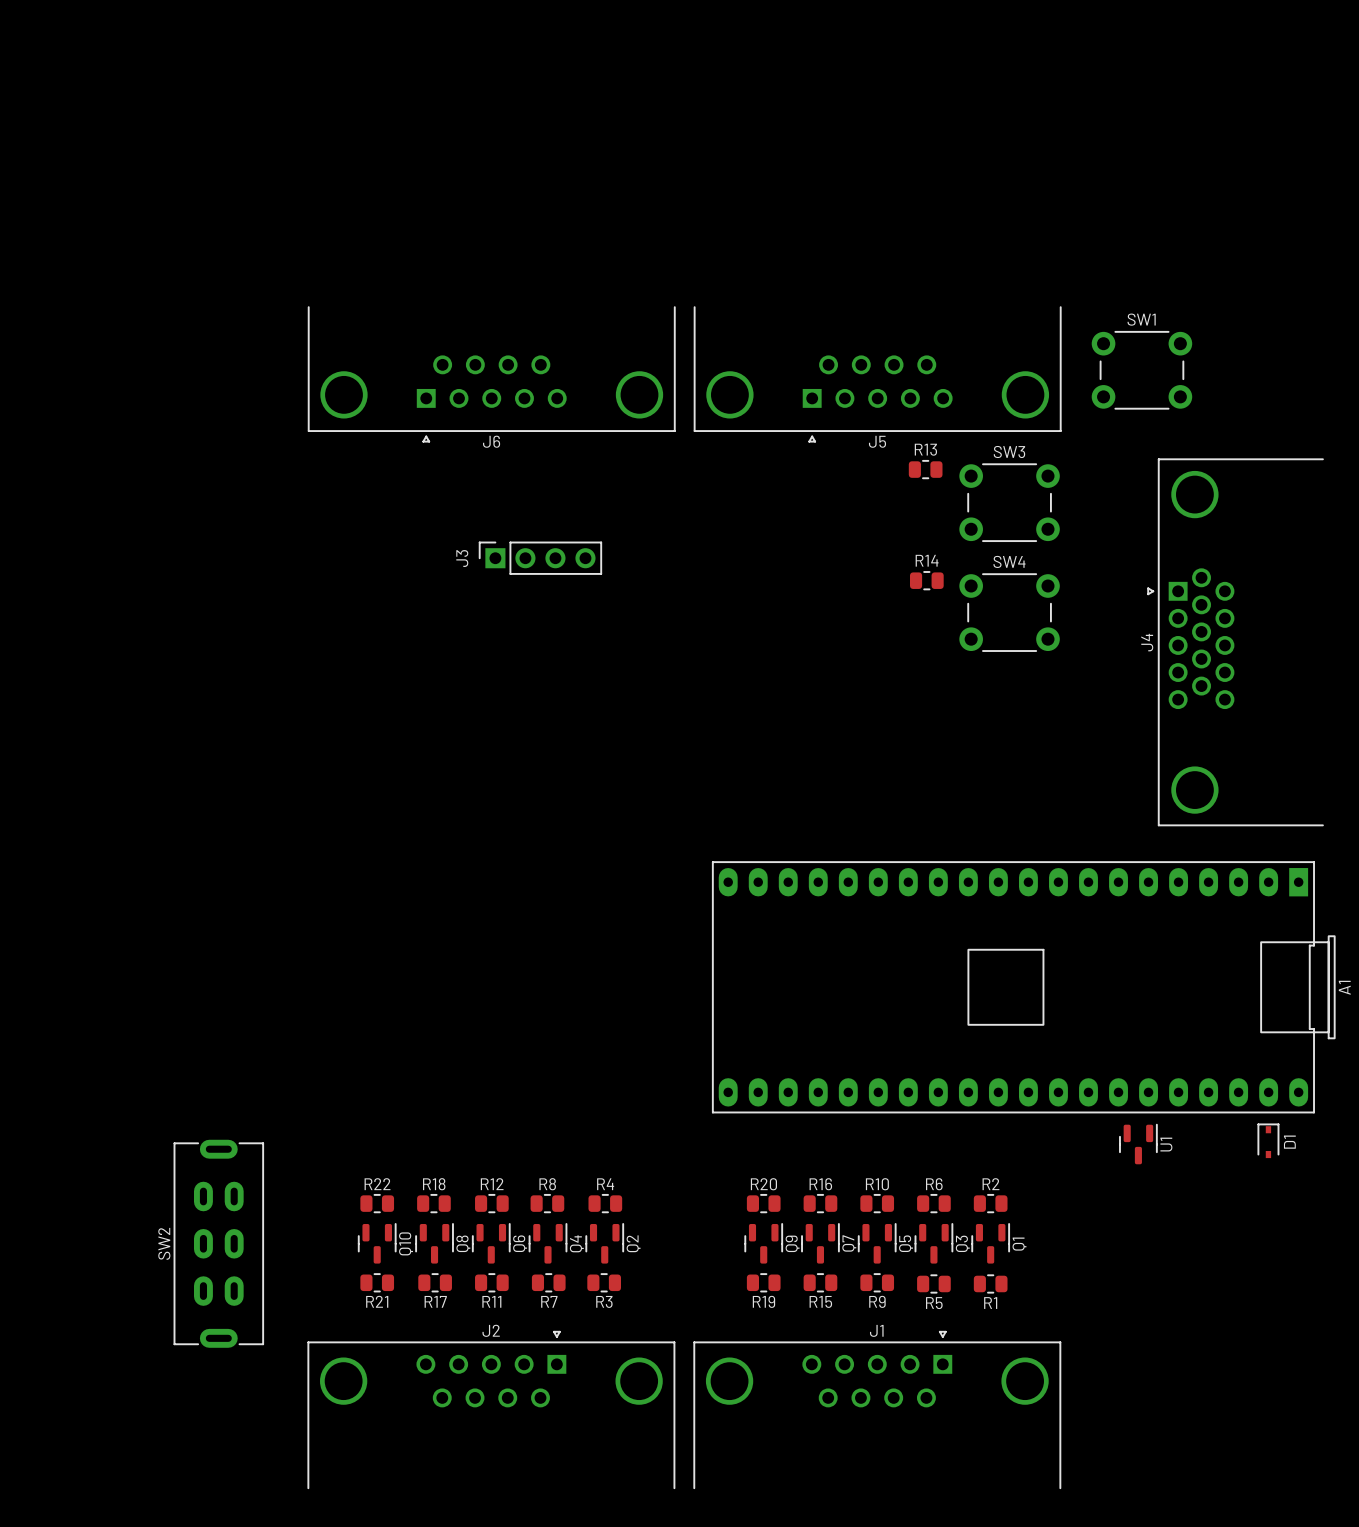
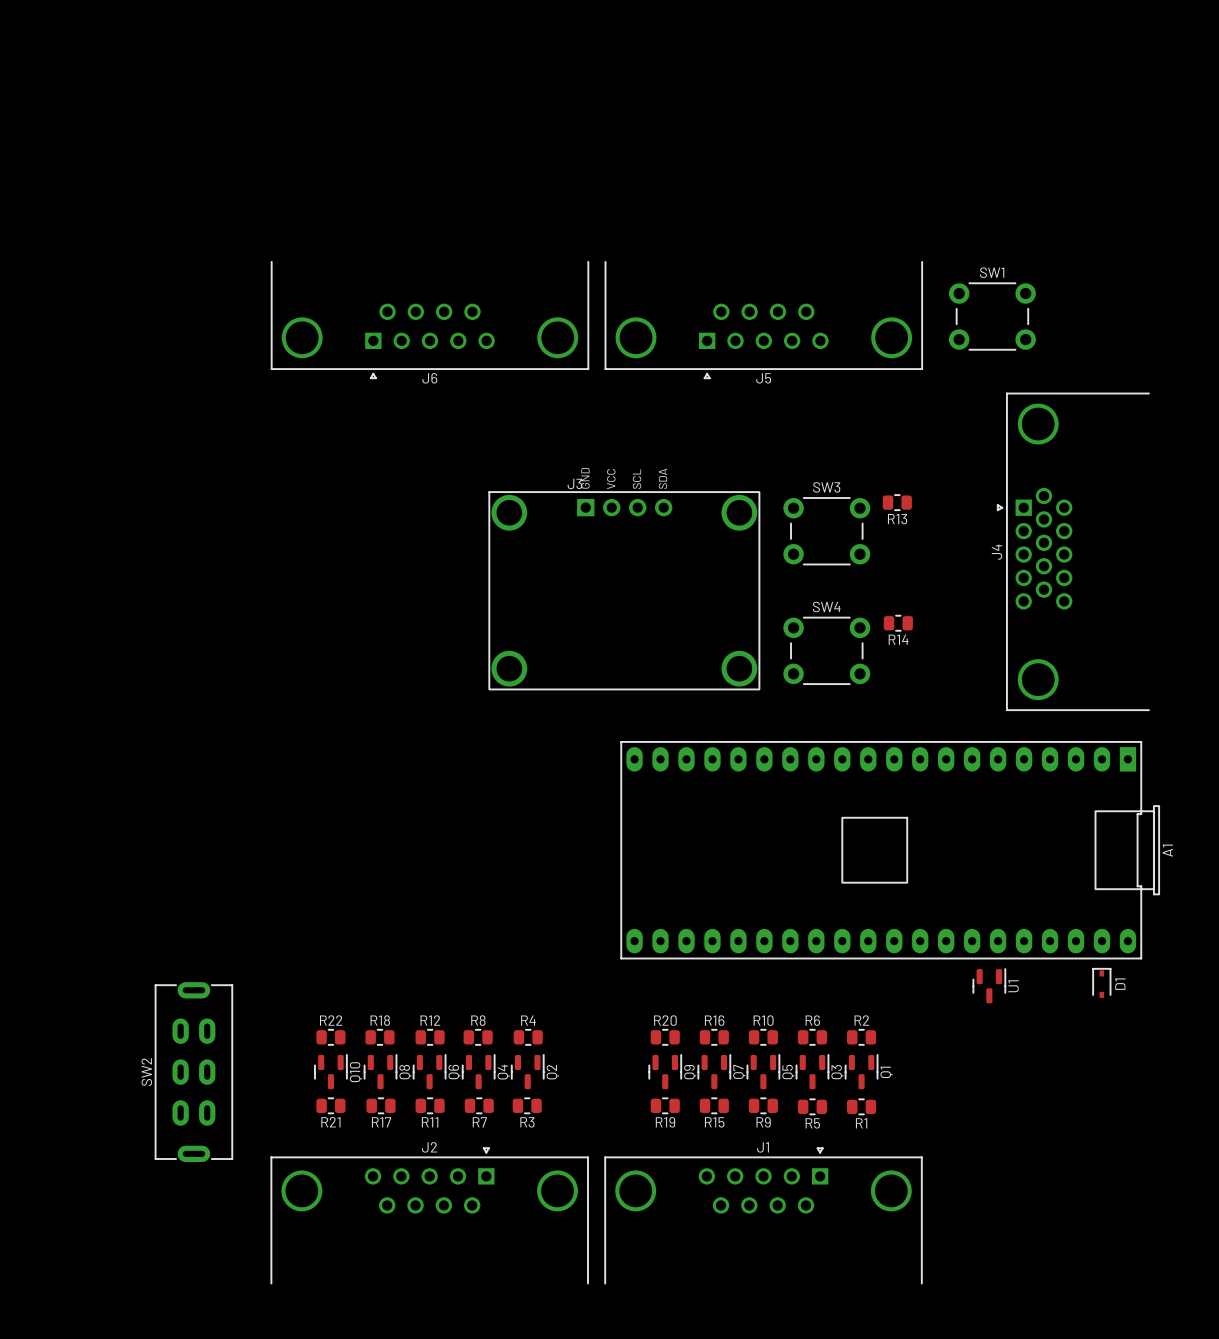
R13 name position: R13 (925, 449) -> R13 (897, 519)
R13 position: (925, 469) -> (897, 502)
SW3 position: (1009, 502) -> (826, 531)
J3 footprint: [478, 541, 602, 575] -> [488, 491, 761, 691]
J3 name position: J3 (462, 558) -> J3 (574, 483)
R14 name position: R14 (927, 560) -> R14 (898, 639)
R14 position: (926, 580) -> (898, 623)
SW4 position: (1009, 612) -> (826, 650)

